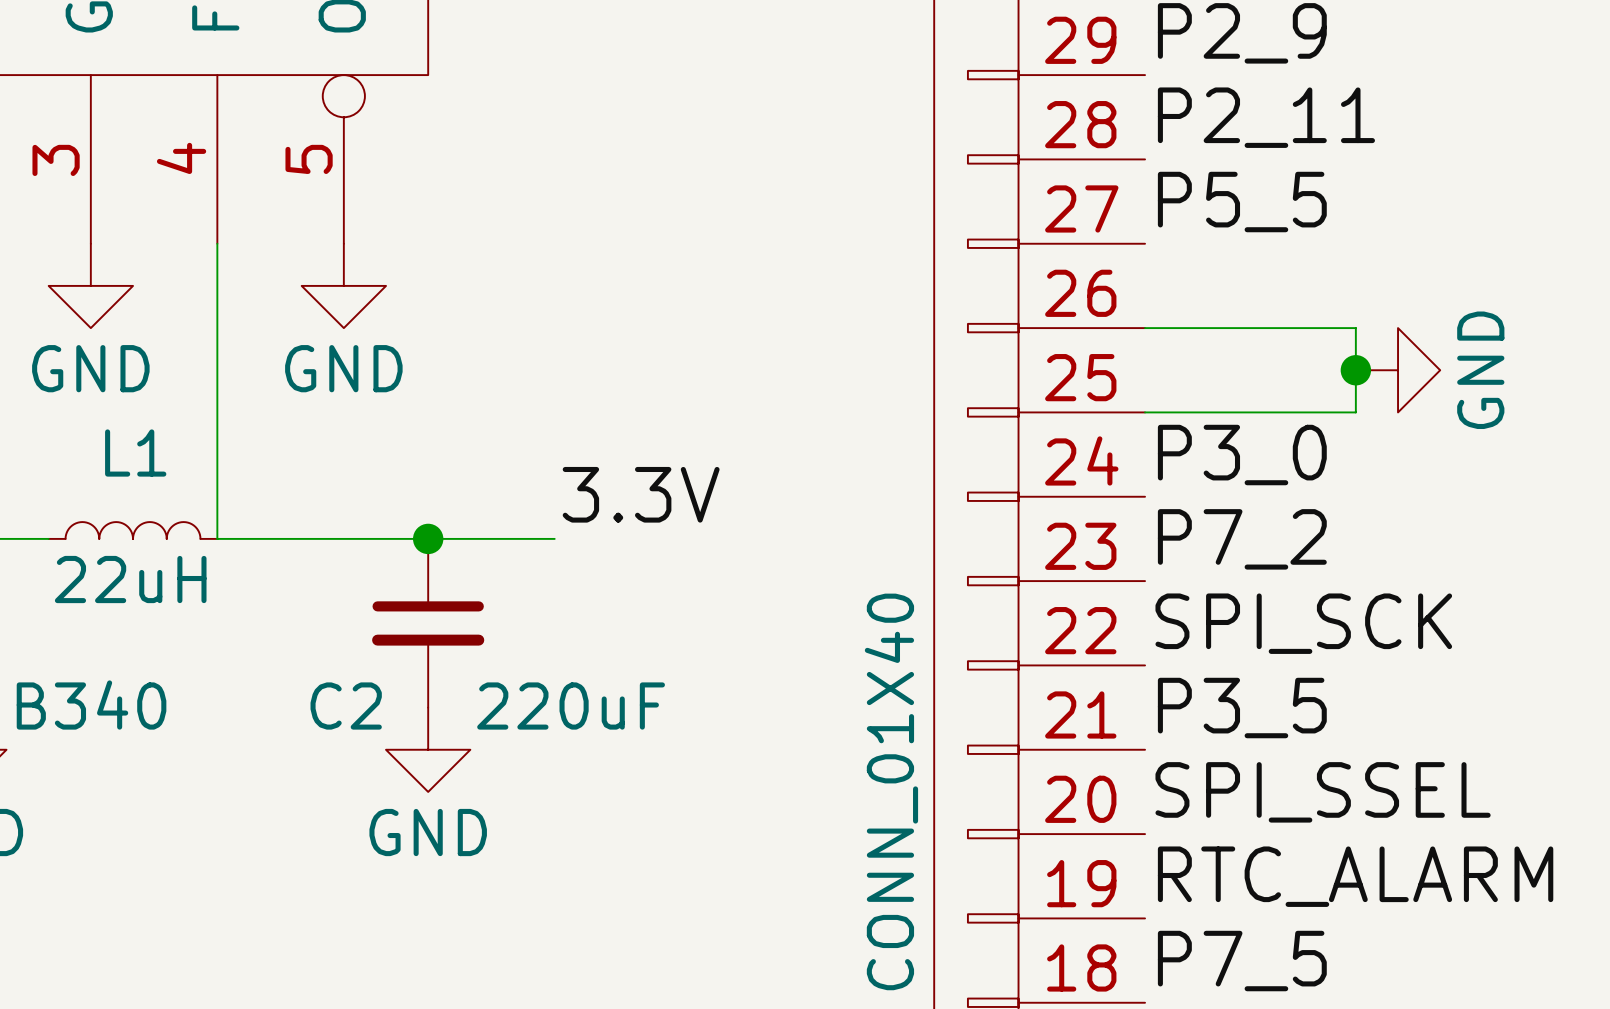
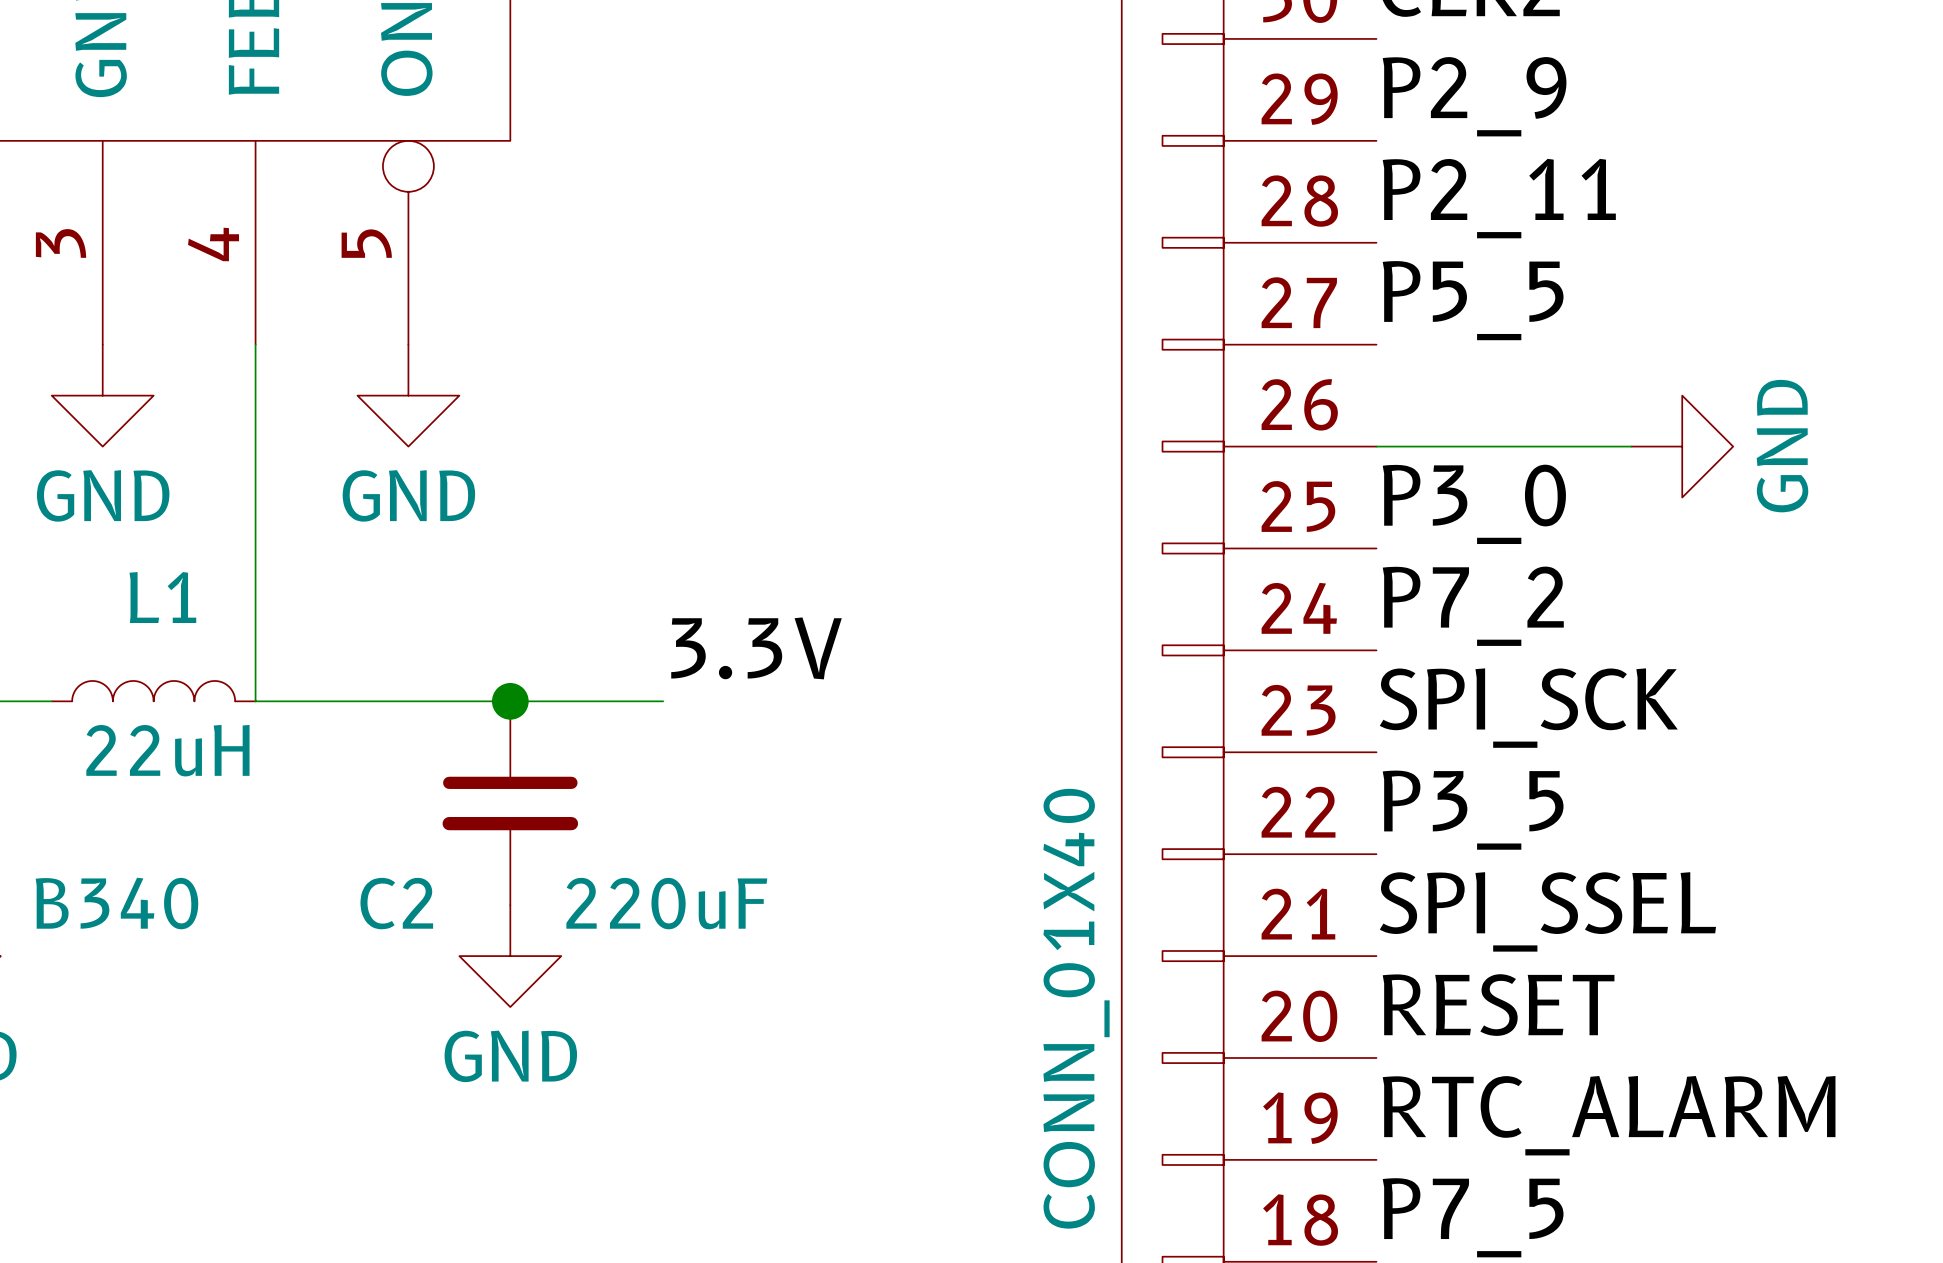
wire: (1355, 328) (1355, 412) (1145, 412) -> none
label: none -> P3_0 (1474, 504)
junction: (1355, 370) -> none
power symbol position: GND (1398, 370) -> GND (1682, 446)
label: P3_0 (1242, 455) -> P7_2 (1473, 606)
label: P7_2 (1242, 539) -> SPI_SCK (1528, 708)
label: SPI_SCK (1303, 623) -> P3_5 (1473, 810)
label: P3_5 (1242, 708) -> SPI_SSEL (1547, 911)
label: SPI_SSEL (1323, 792) -> RESET (1498, 1005)

